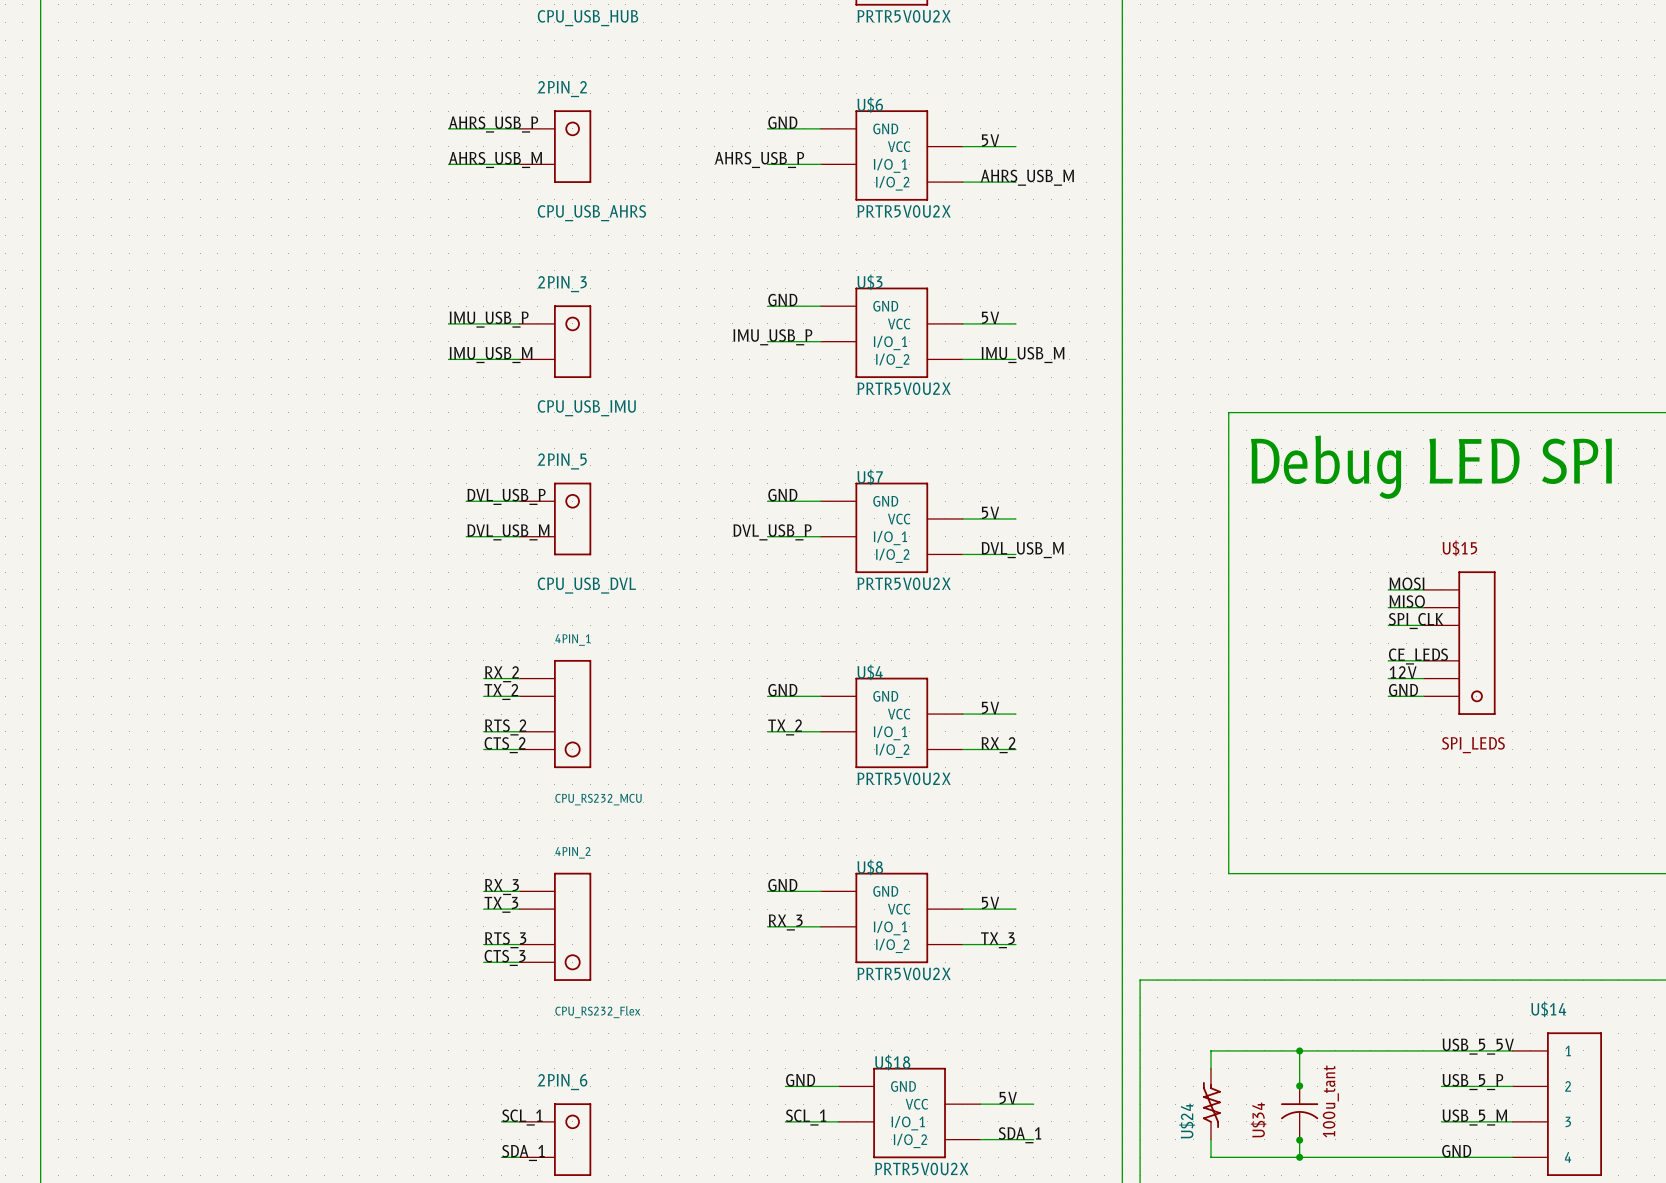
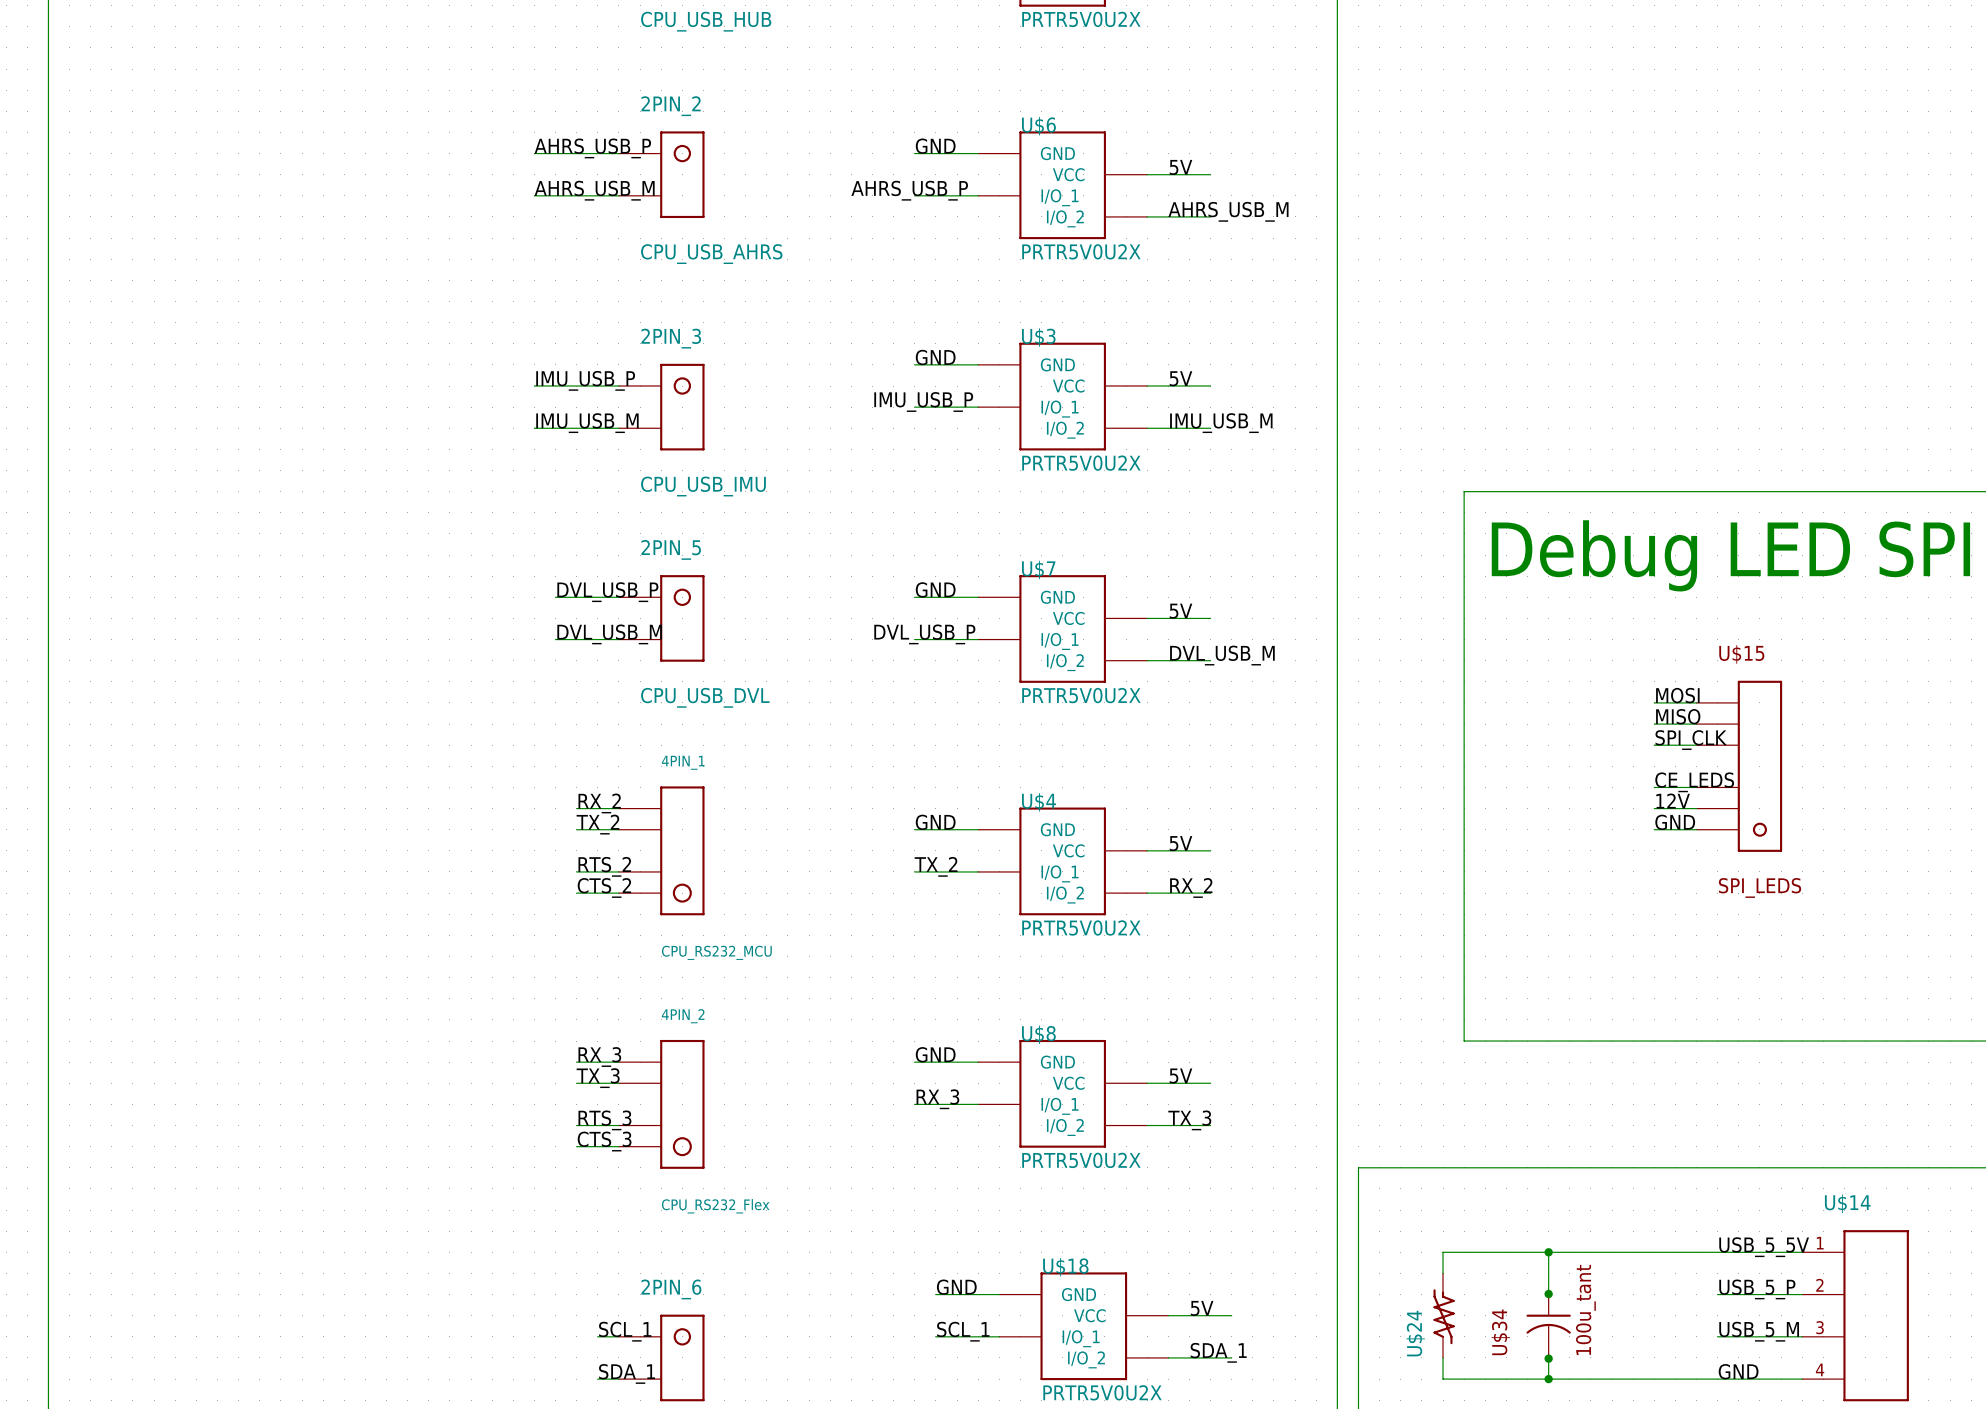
U$14 pin number: none -> 1 (1820, 1243)
U$14 pin name: 1 (1568, 1050) -> none
U$14 pin number: none -> 2 (1819, 1285)
U$14 pin name: 2 (1568, 1086) -> none
U$14 pin number: none -> 3 (1820, 1327)
U$14 pin name: 3 (1568, 1121) -> none
U$14 pin number: none -> 4 (1820, 1369)
U$14 pin name: 4 (1568, 1157) -> none

